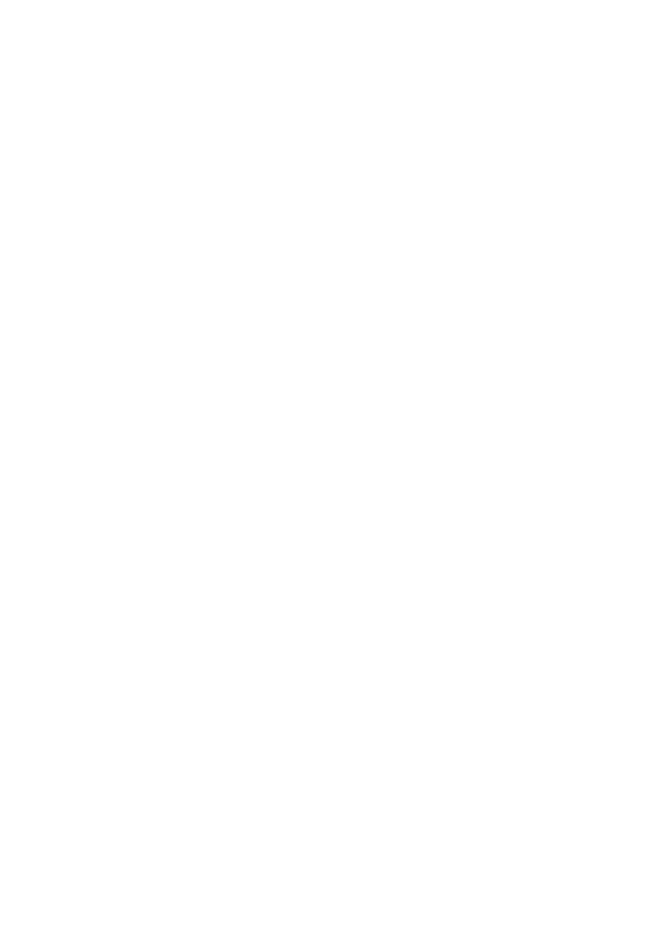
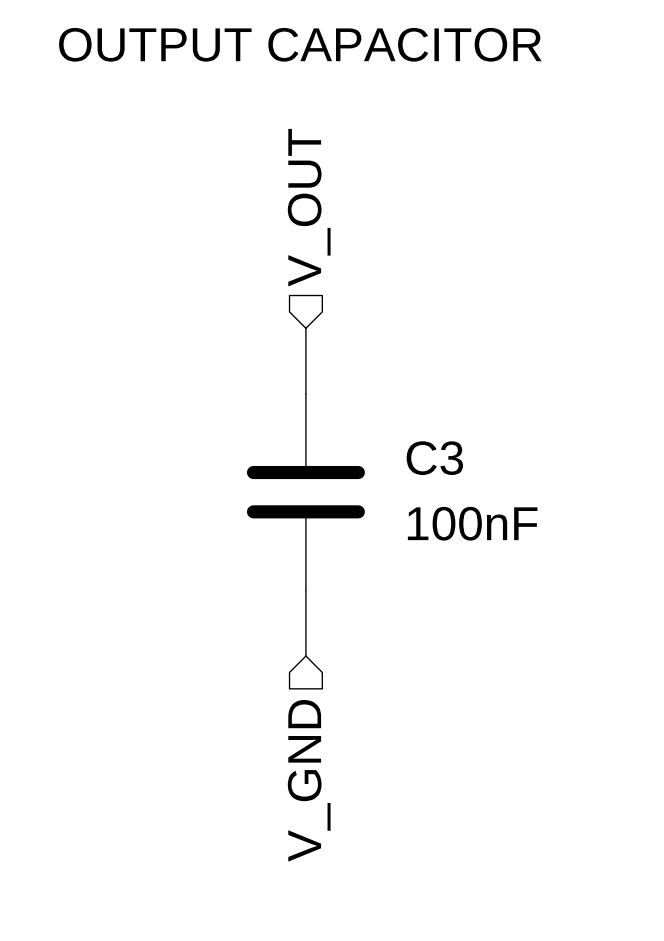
text: none -> OUTPUT CAPACITOR (300, 44)
hierarchical label: none -> V_OUT (309, 207)
wire: none -> (305, 328) (305, 393)
C3: none -> 100nF (305, 492)
wire: none -> (305, 590) (305, 656)
hierarchical label: none -> V_GND (309, 780)

